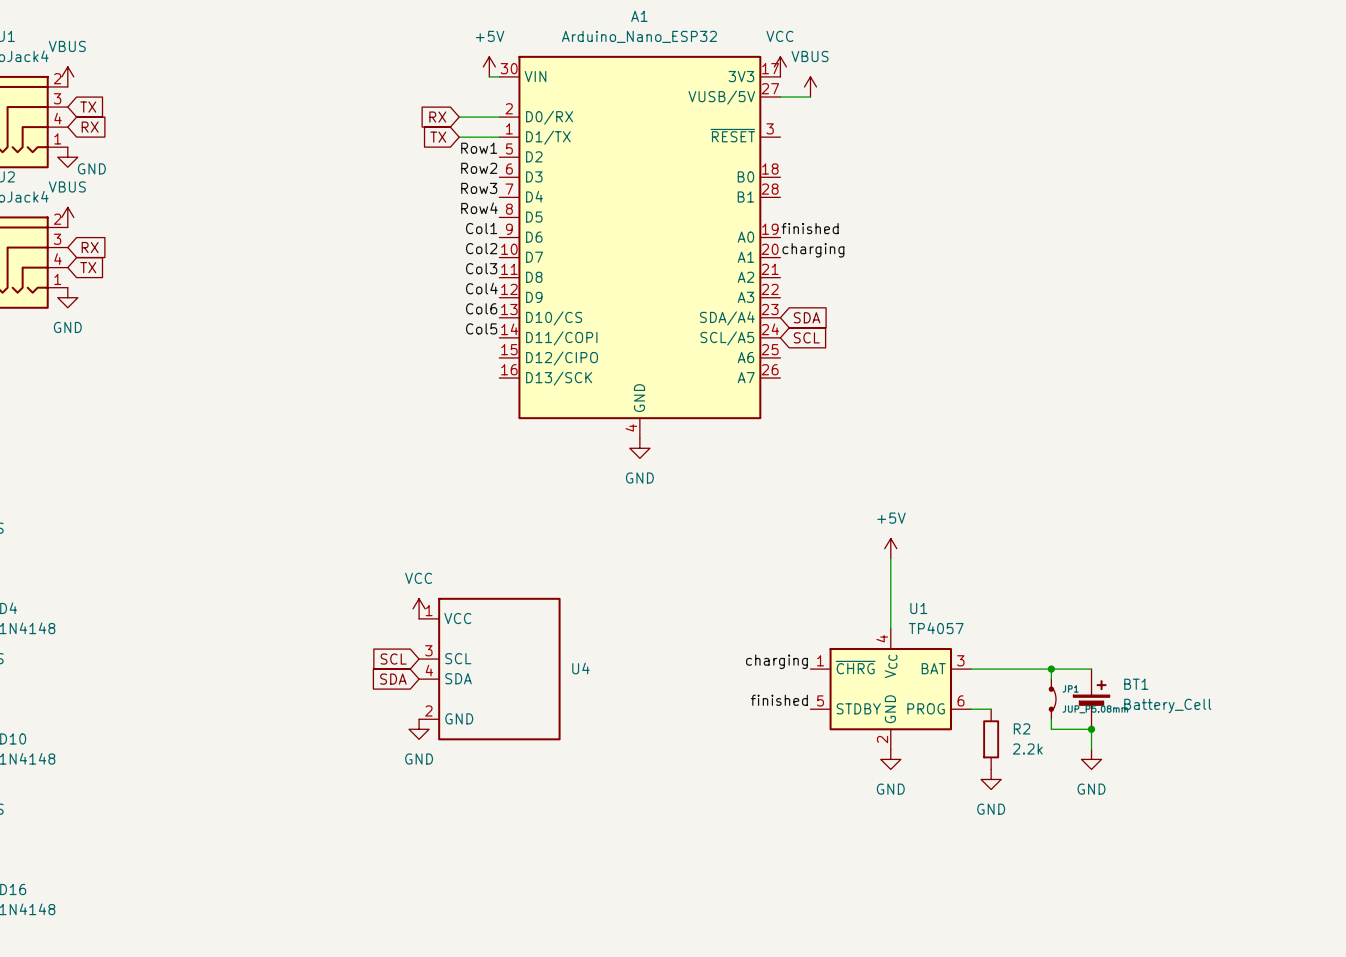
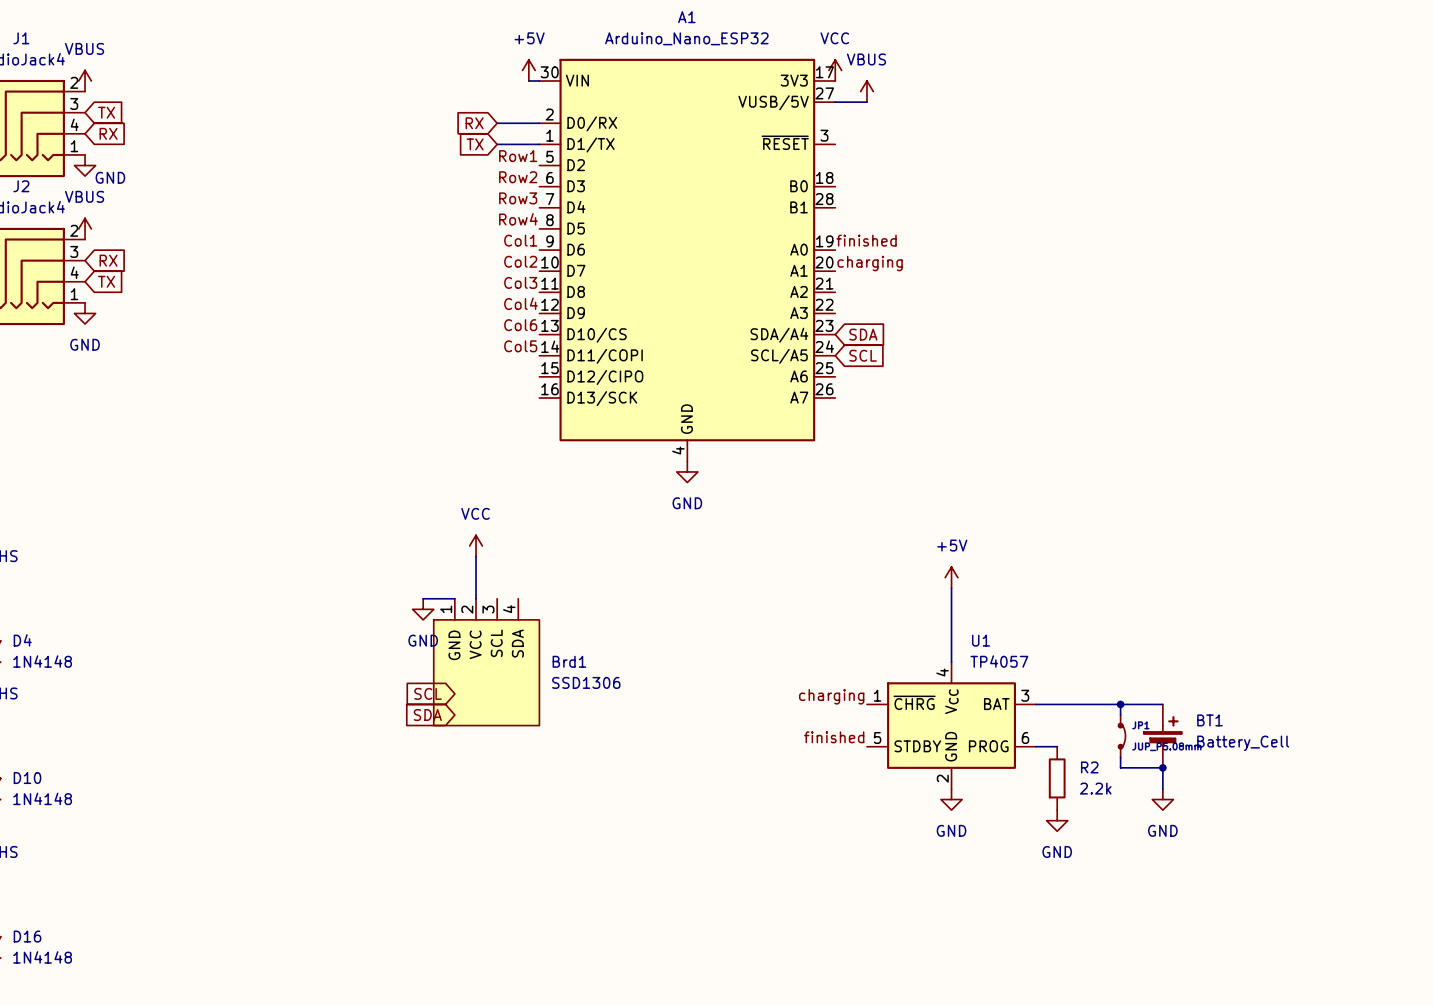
wire: none -> (476, 556) (476, 598)
wire: none -> (423, 598) (454, 598)
power symbol position: VCC (419, 608) -> VCC (476, 545)
Brd1: none -> SSD1306 (486, 662)
U4: (489, 669) -> none
power symbol position: GND (419, 729) -> GND (423, 609)

